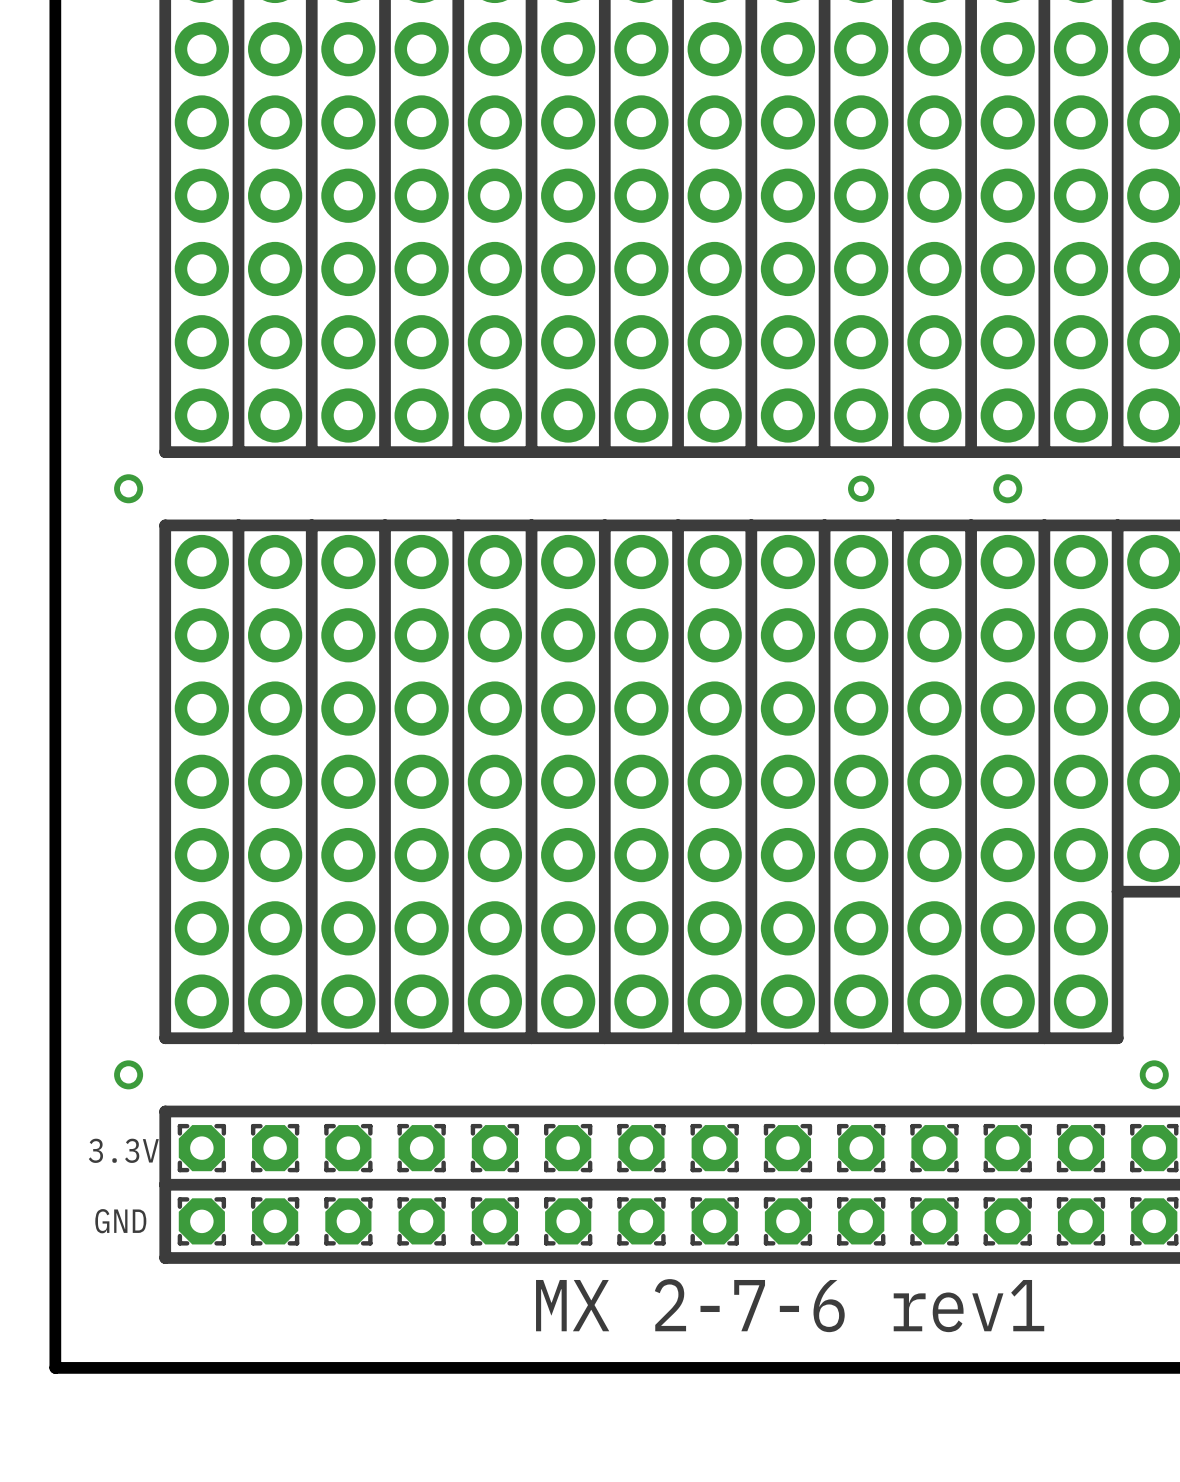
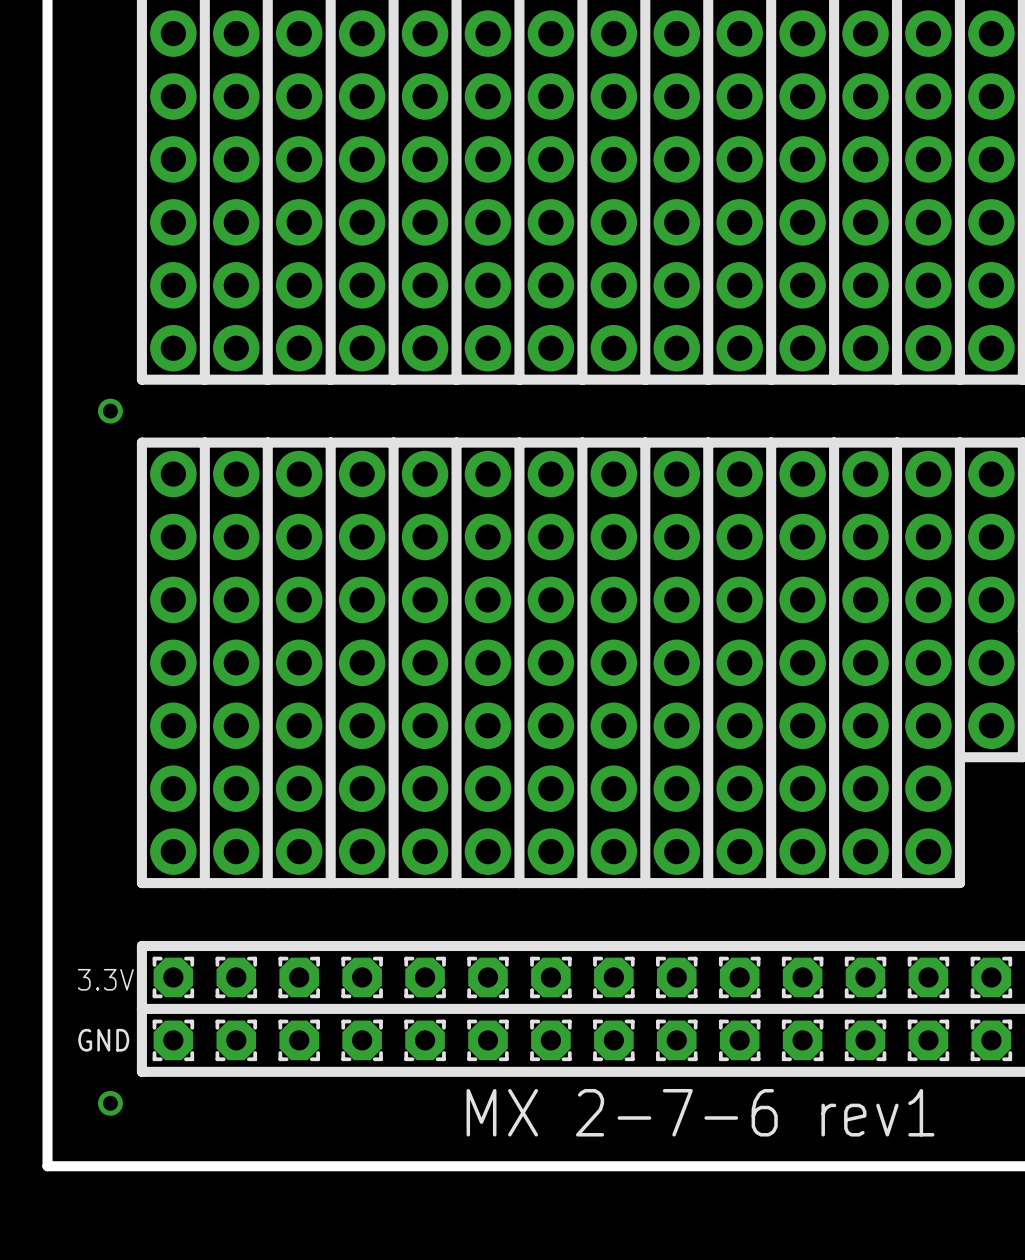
via: (861, 488) -> none
via: (1007, 488) -> none
via: (128, 1074) -> none
via: (1154, 1074) -> none
via: none -> (110, 1103)

